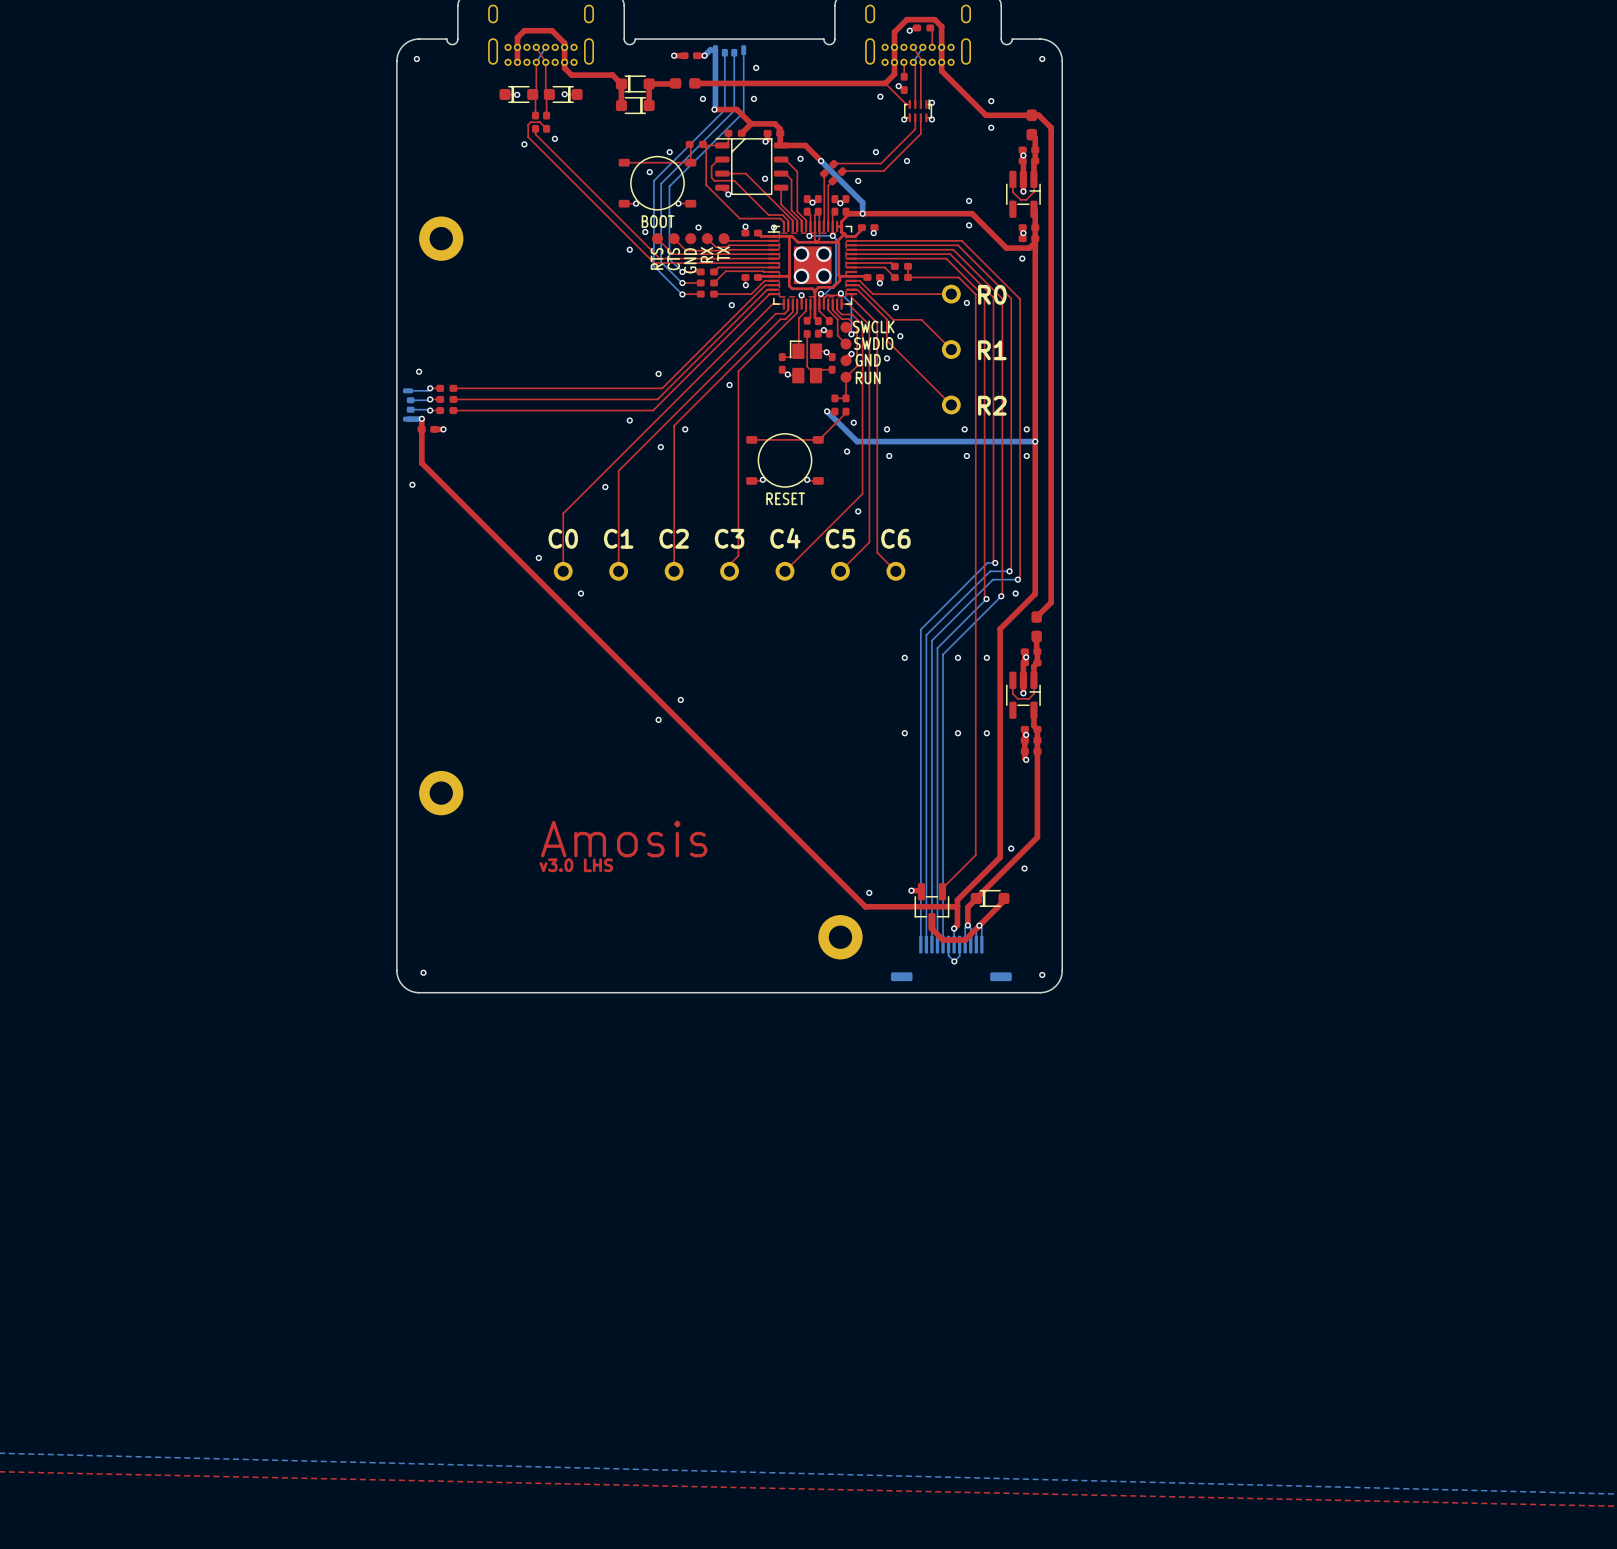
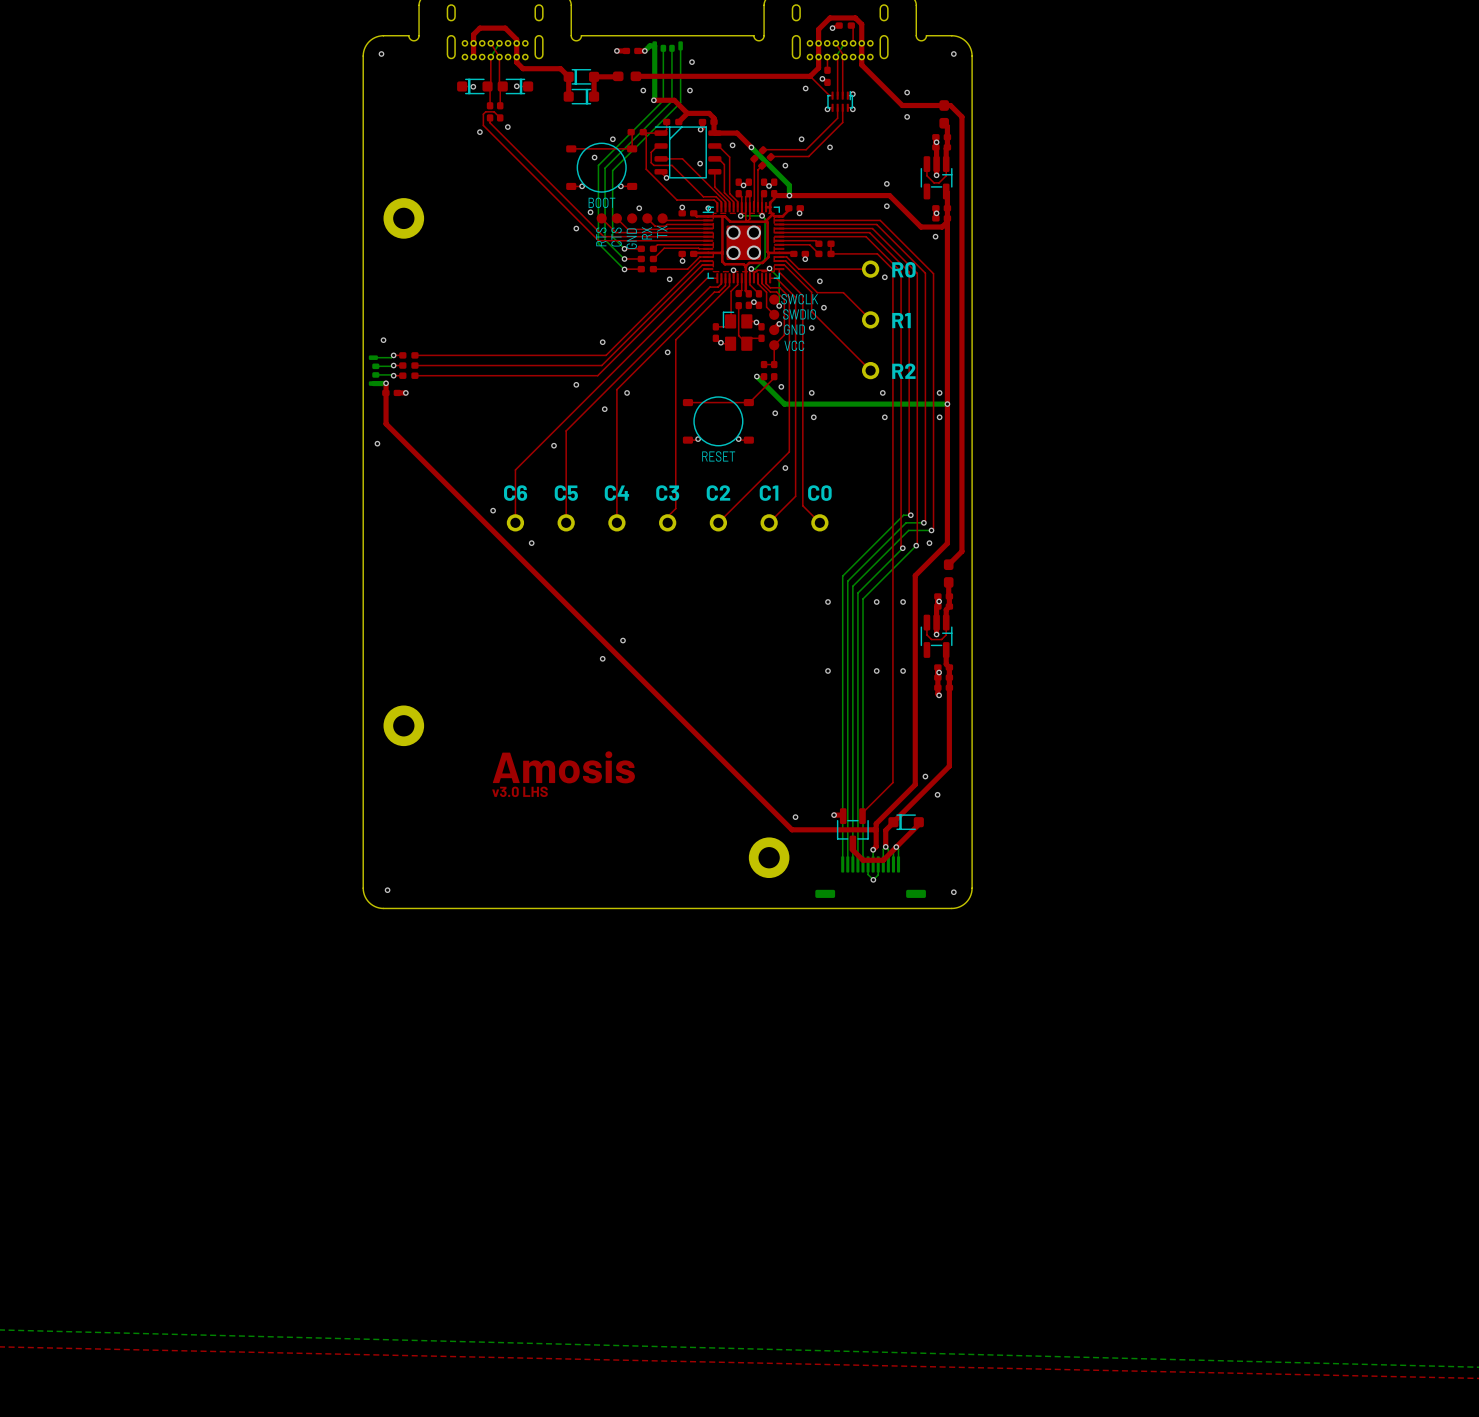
part value: RUN (868, 377) -> VCC (794, 345)
text: C0 (563, 538) -> C6 (515, 493)
text: C1 (618, 538) -> C5 (566, 493)
text: C2 (674, 538) -> C4 (616, 493)
text: C4 (785, 538) -> C2 (718, 493)
text: C5 (840, 538) -> C1 (769, 493)
text: C6 (895, 538) -> C0 (819, 493)

